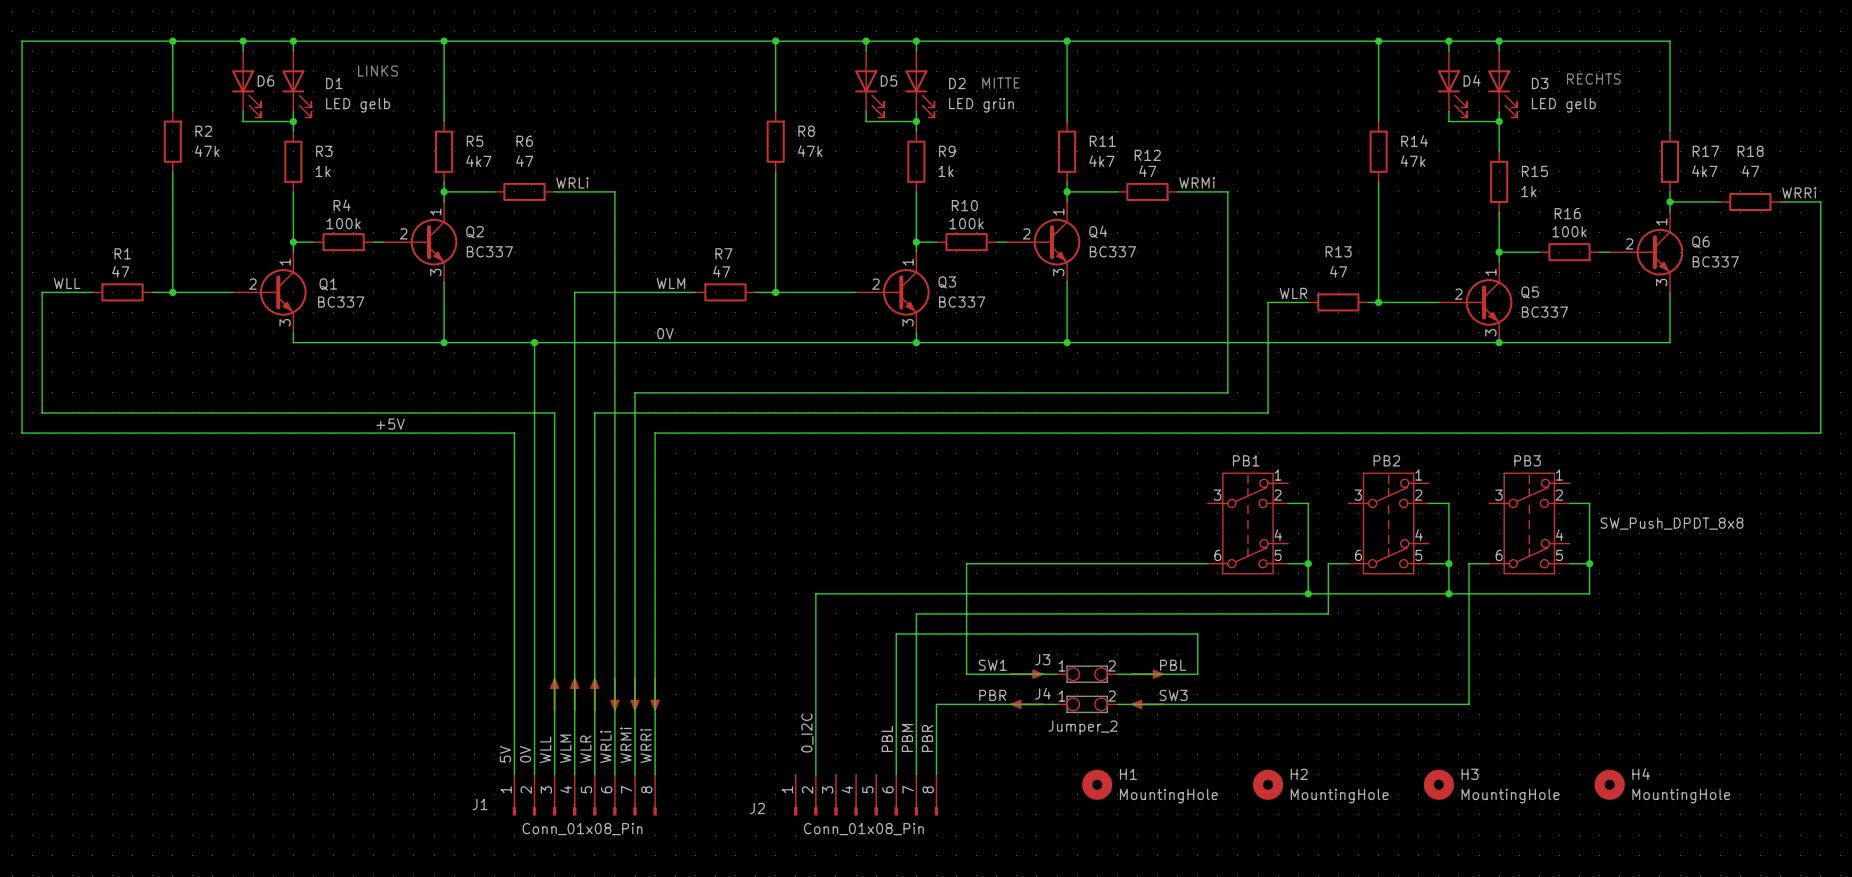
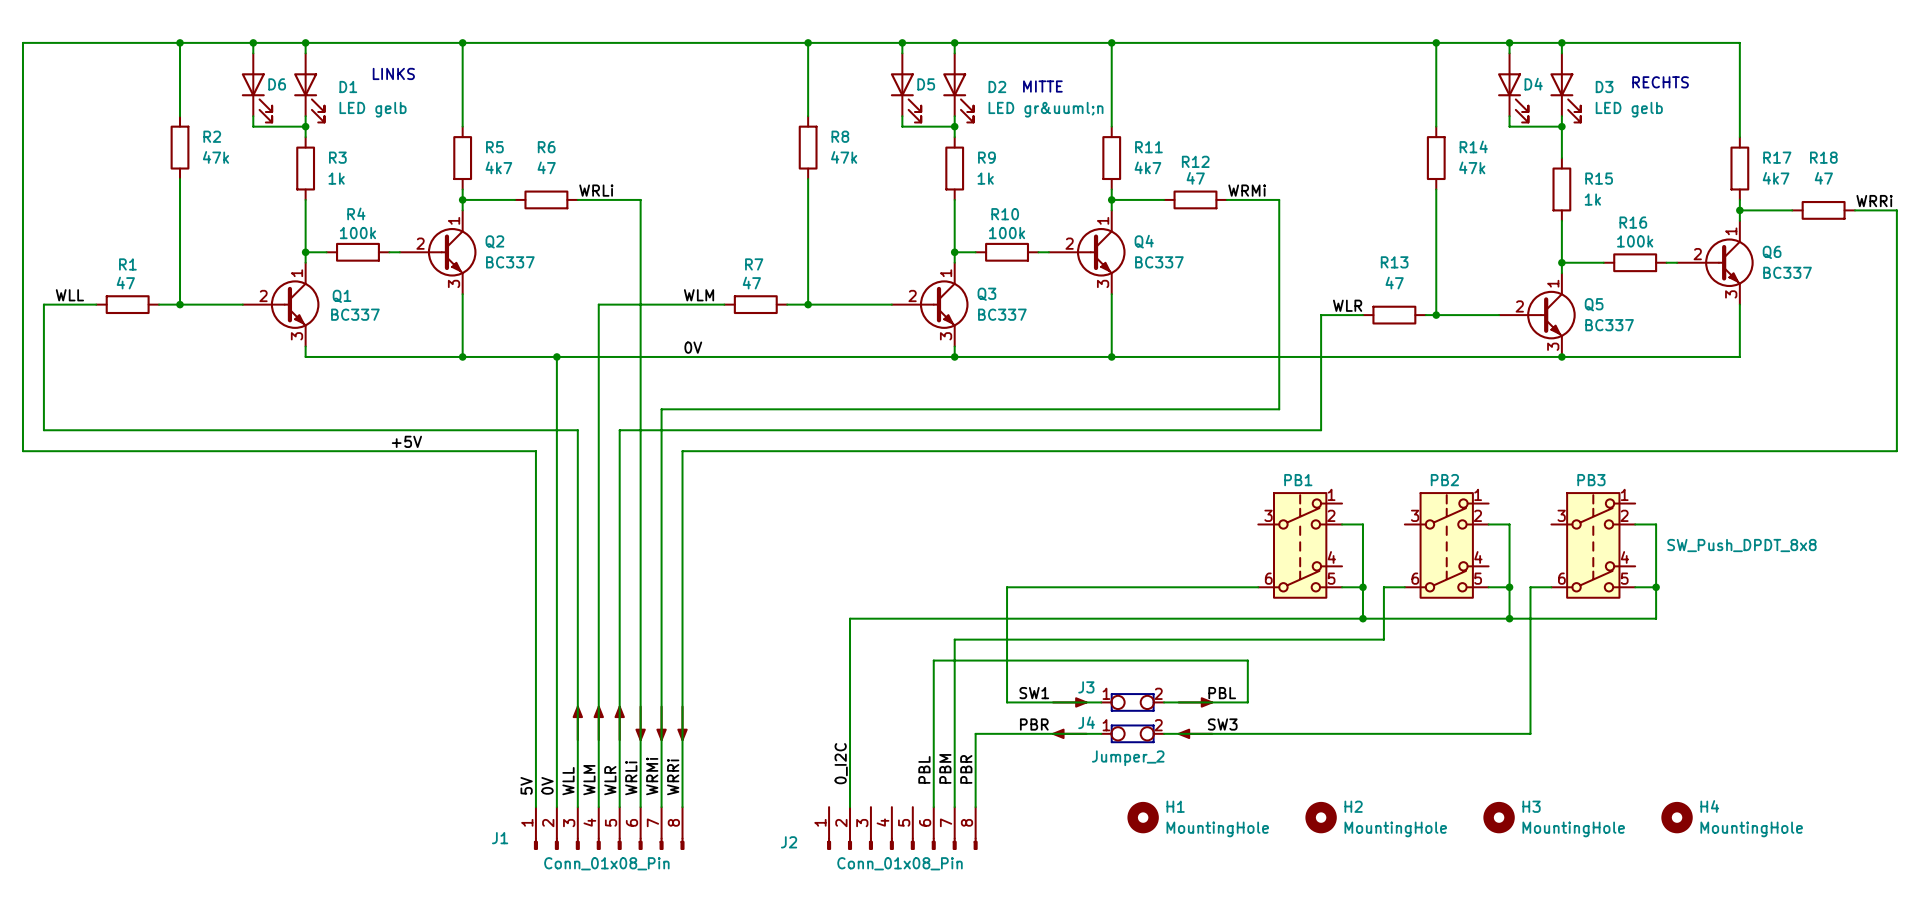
D2 value: LED grün (981, 105) -> LED gr&uuml;n (1046, 109)

